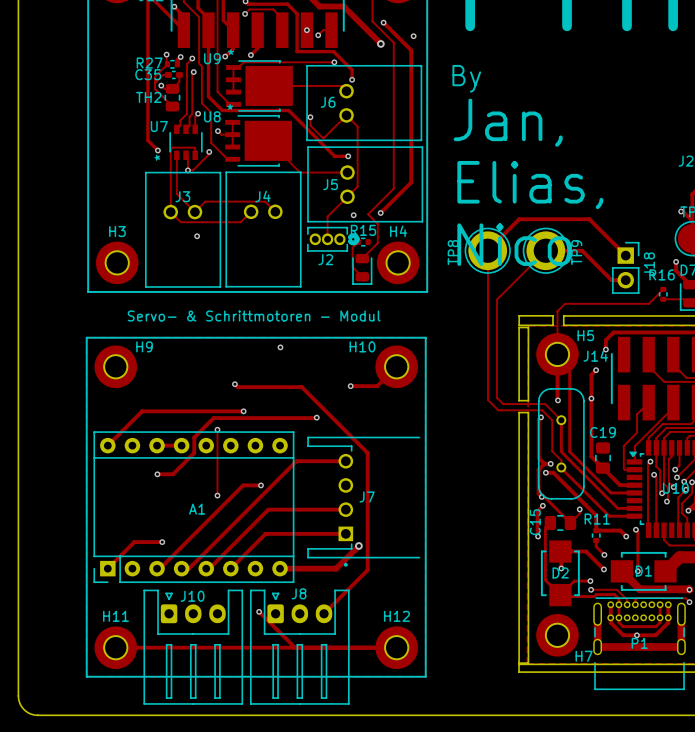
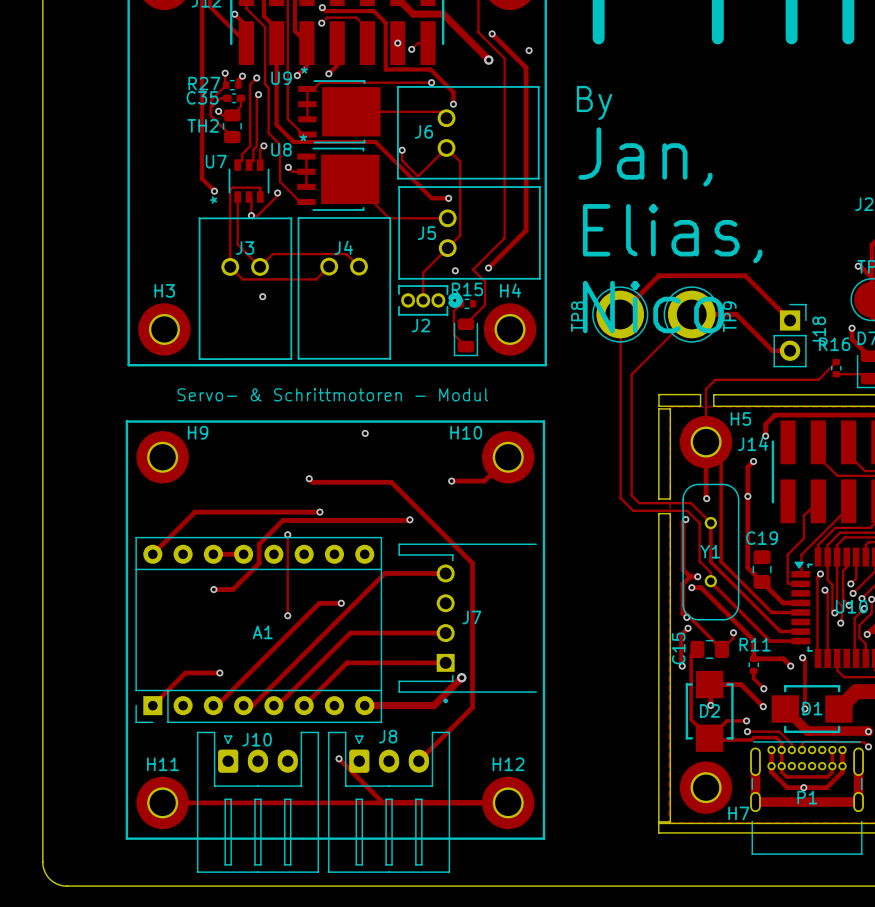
Y1 name: none -> Y1 (710, 551)

